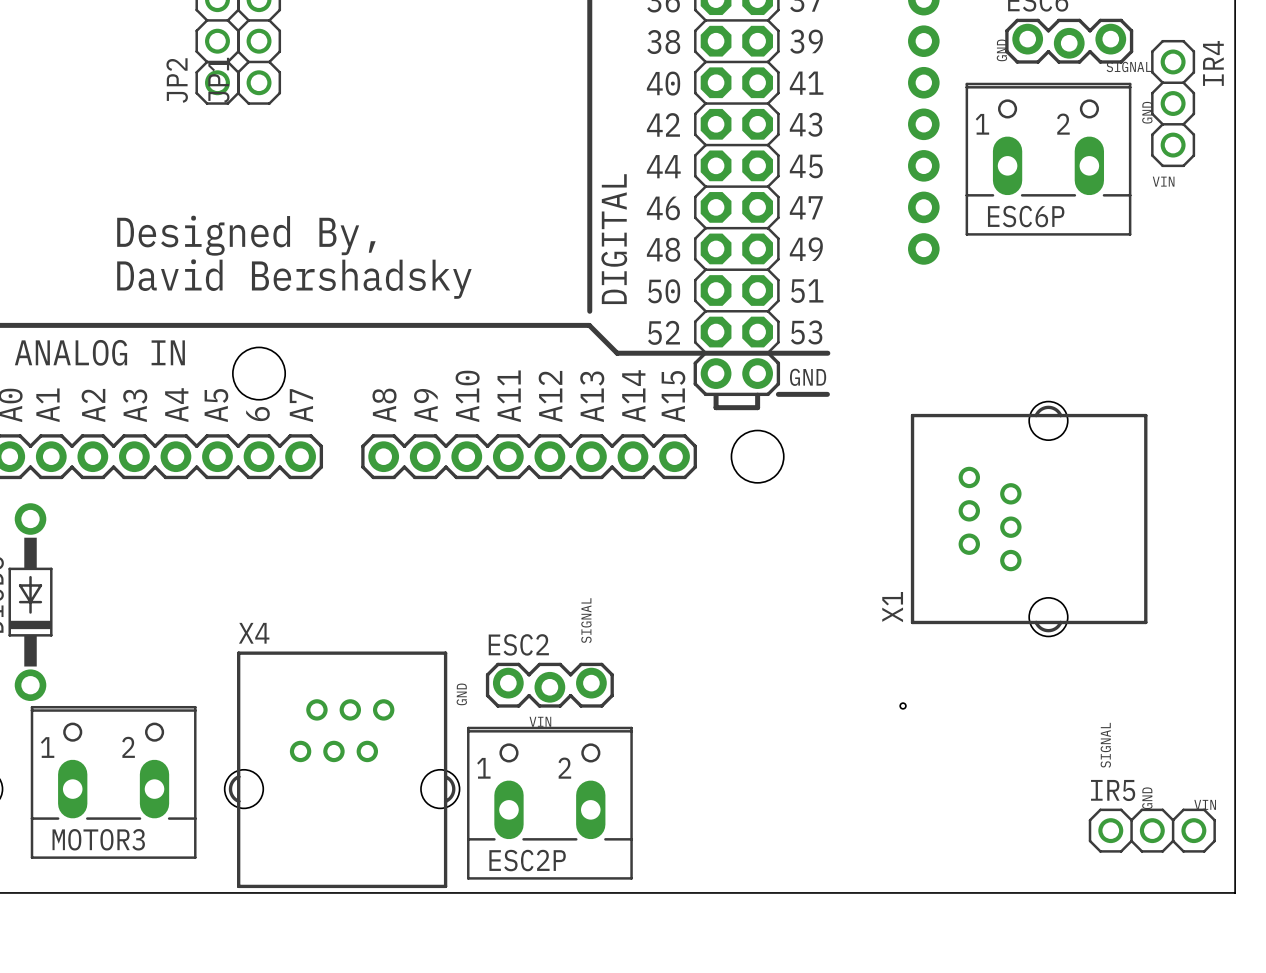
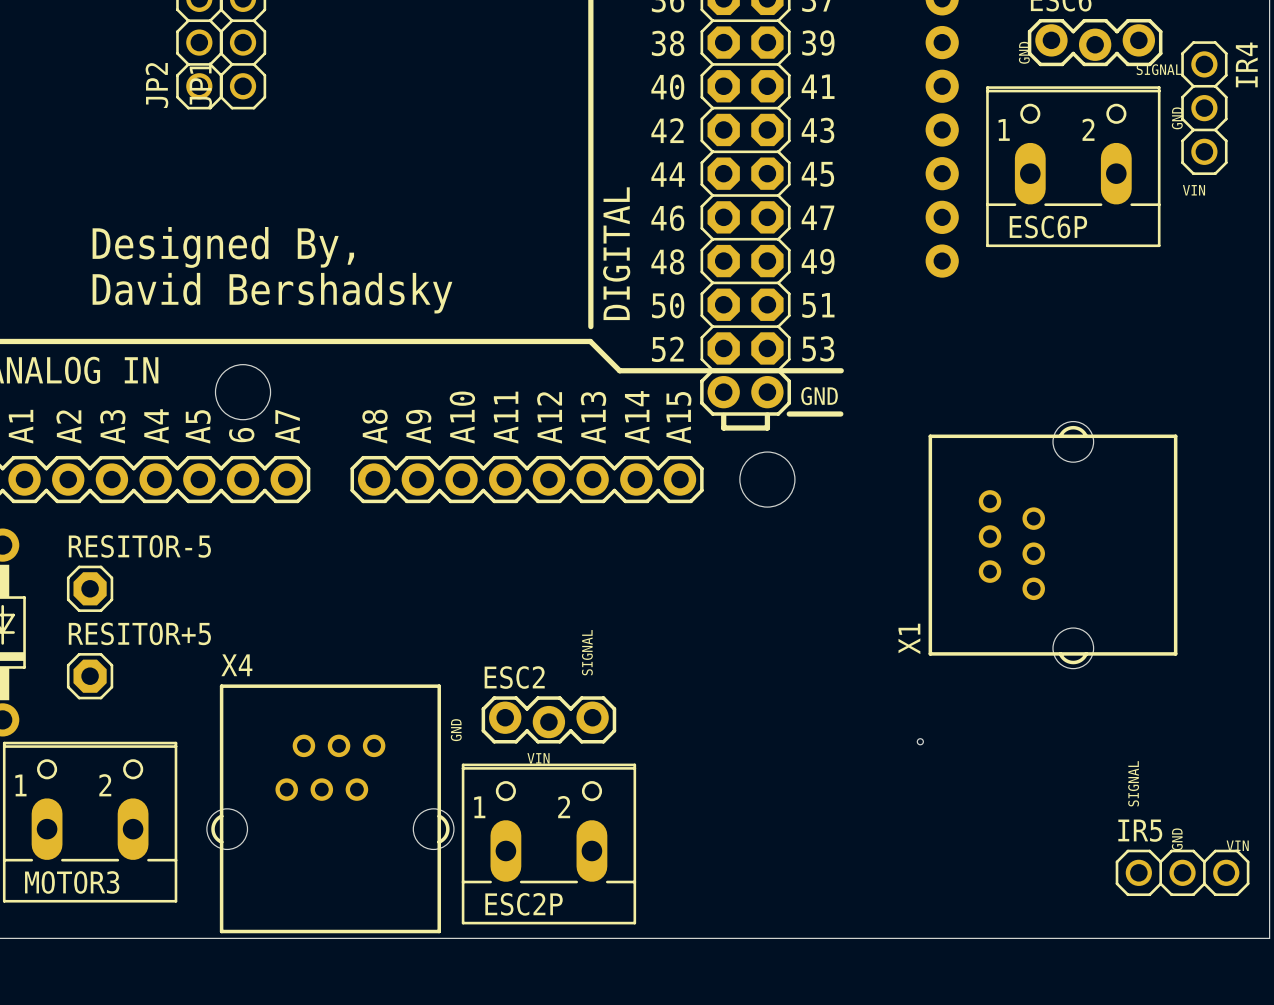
RESITOR-5: none -> (90, 588)
RESITOR+5: none -> (90, 676)

